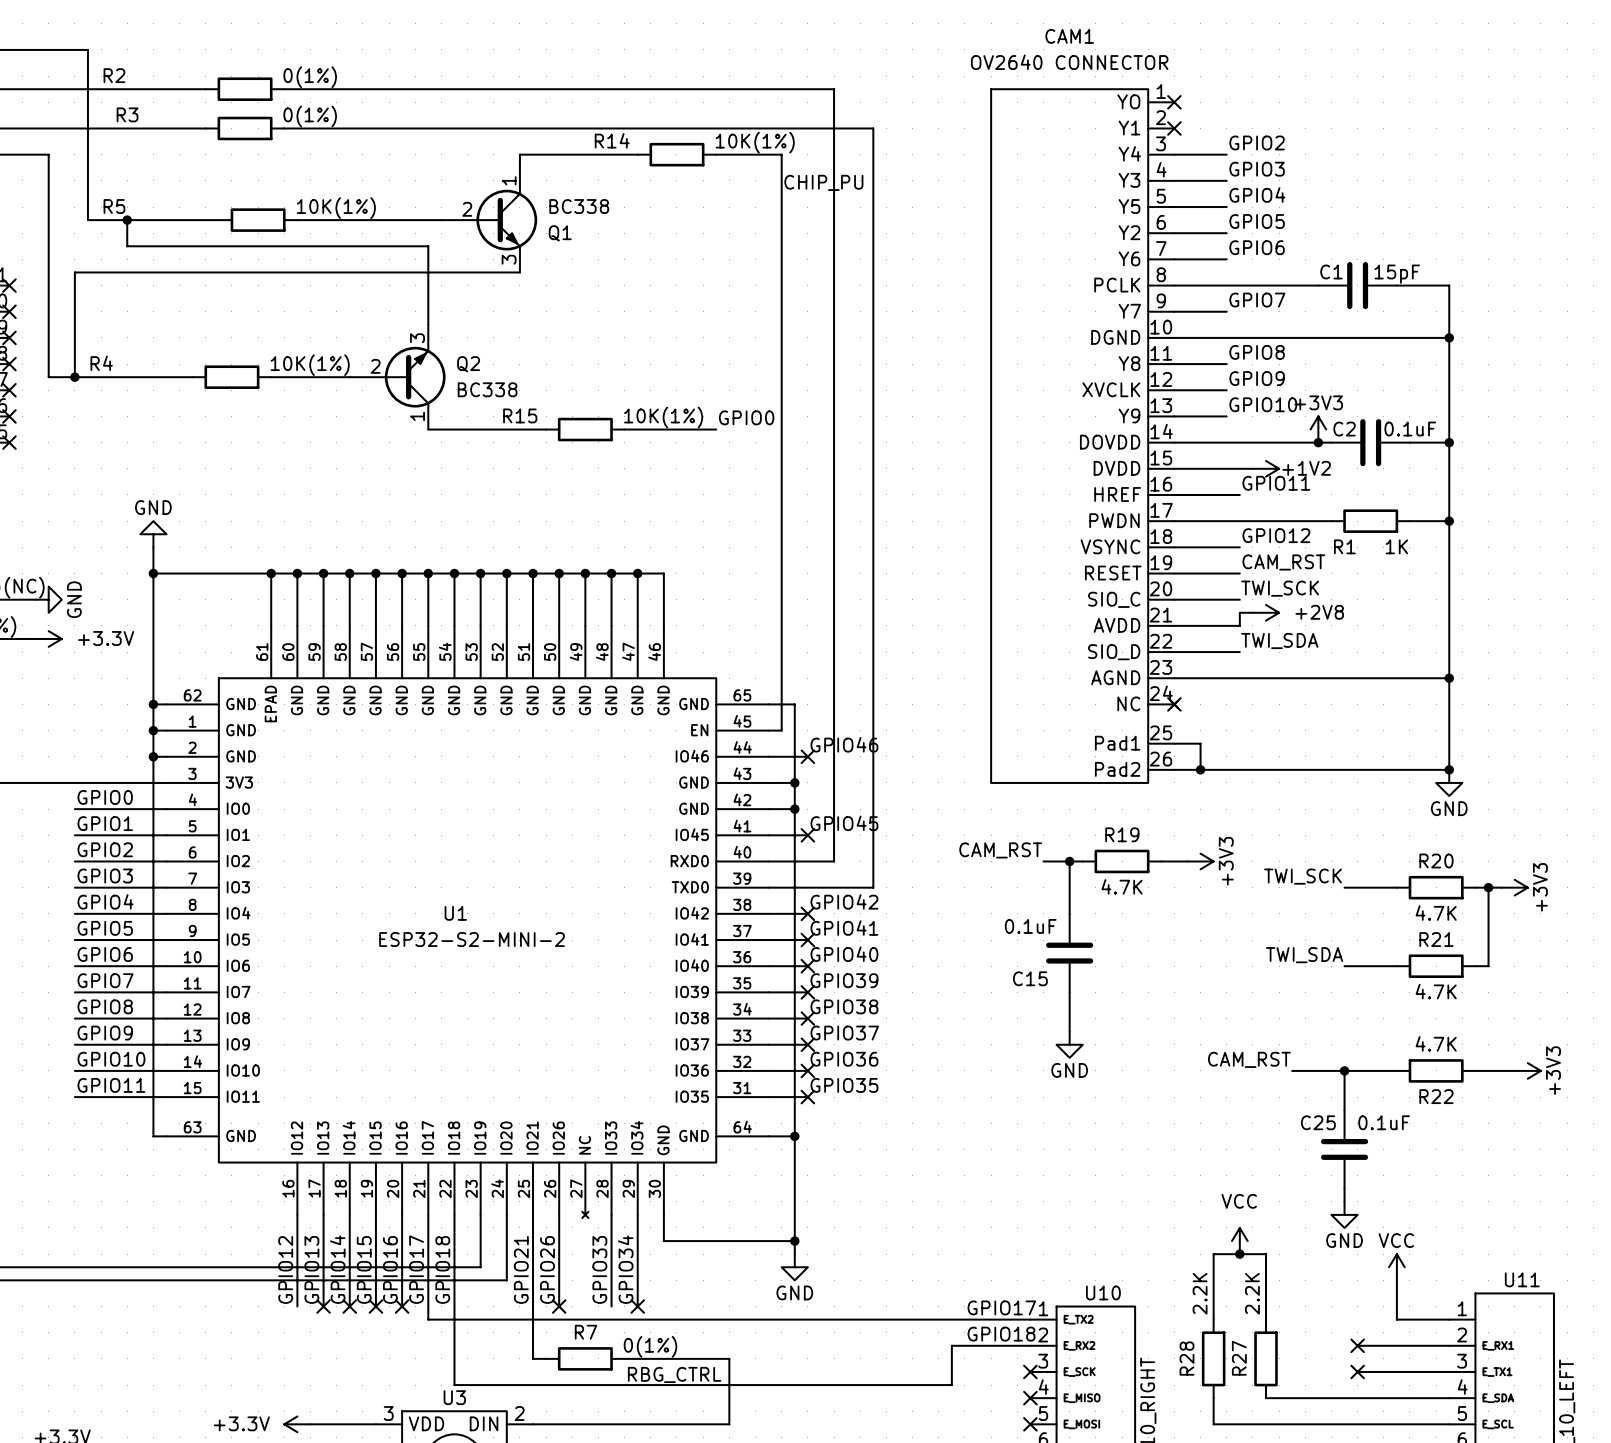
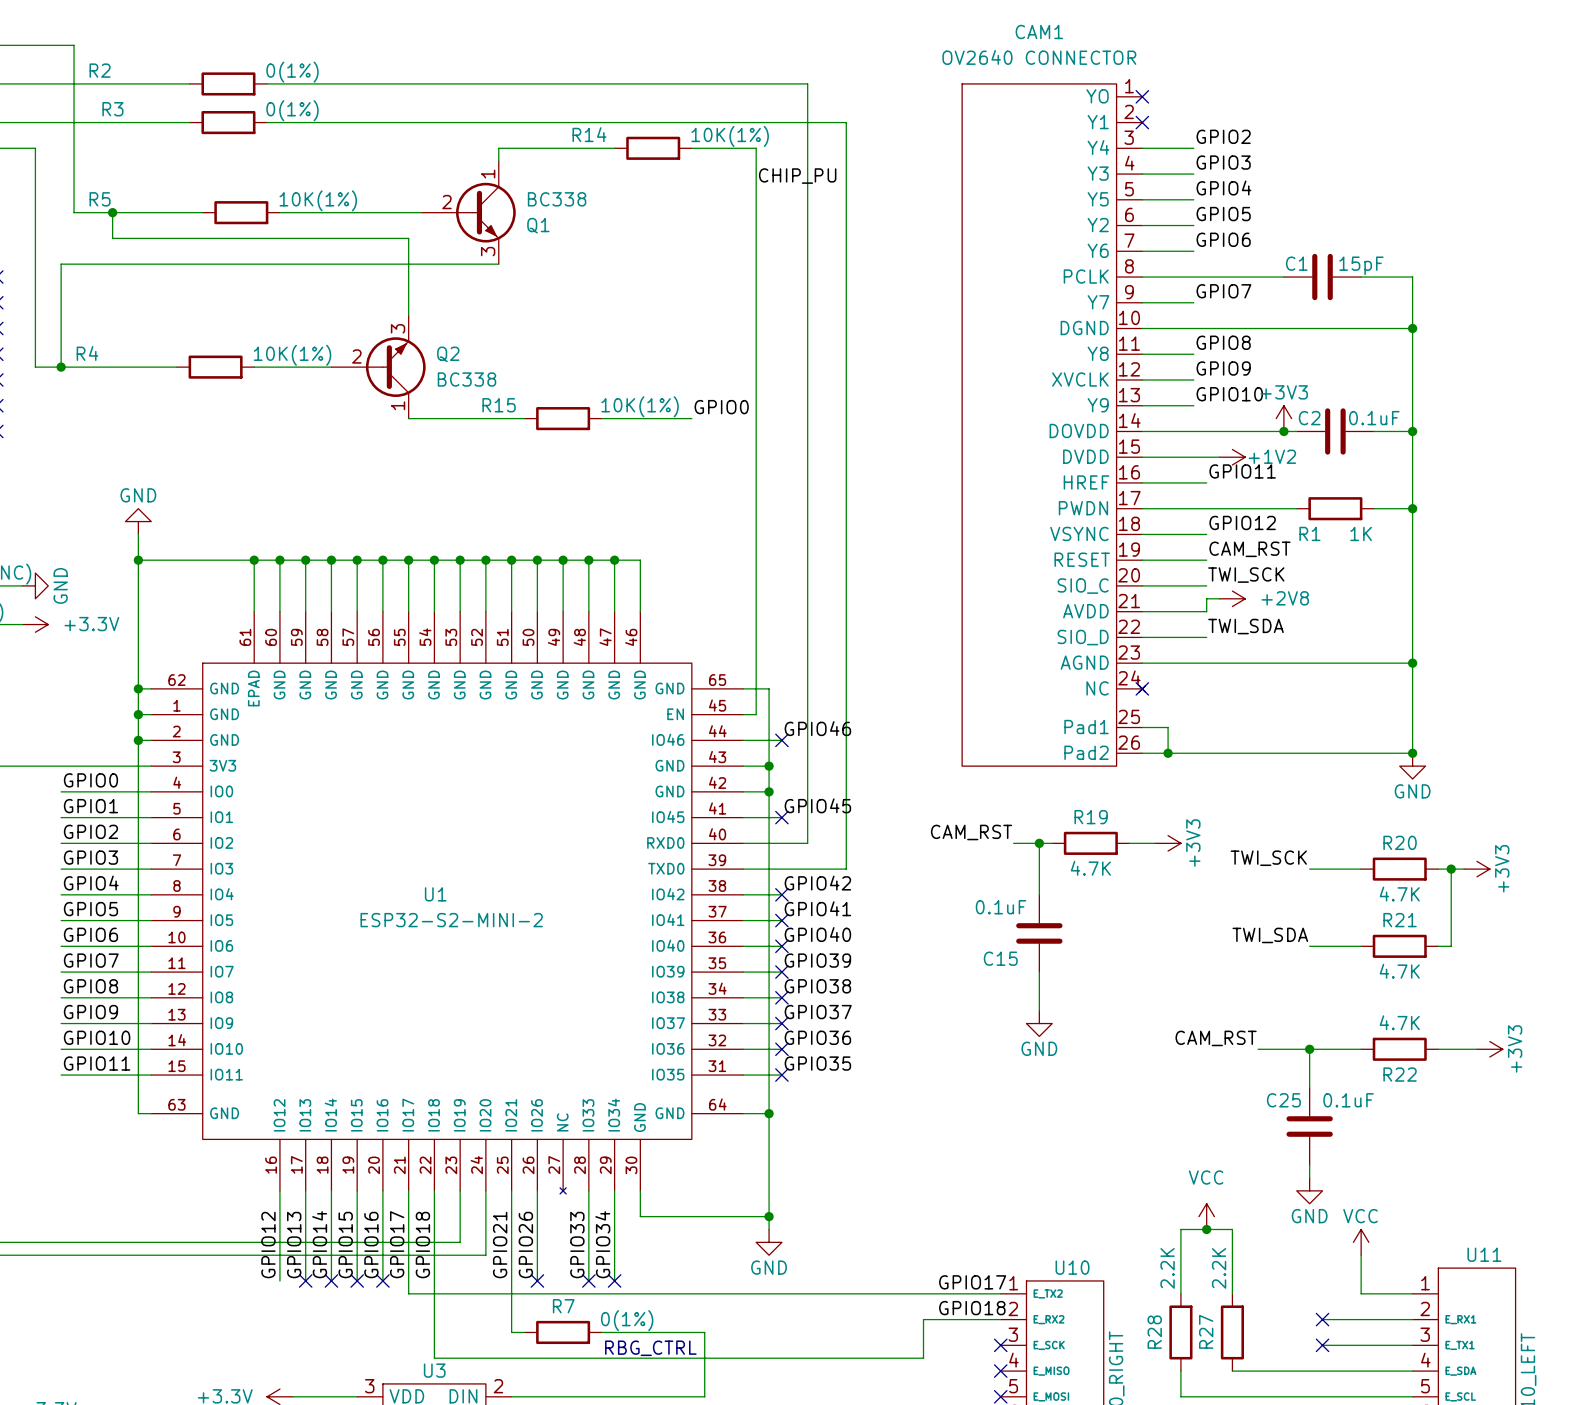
no-connect mark: none -> (588, 1280)

